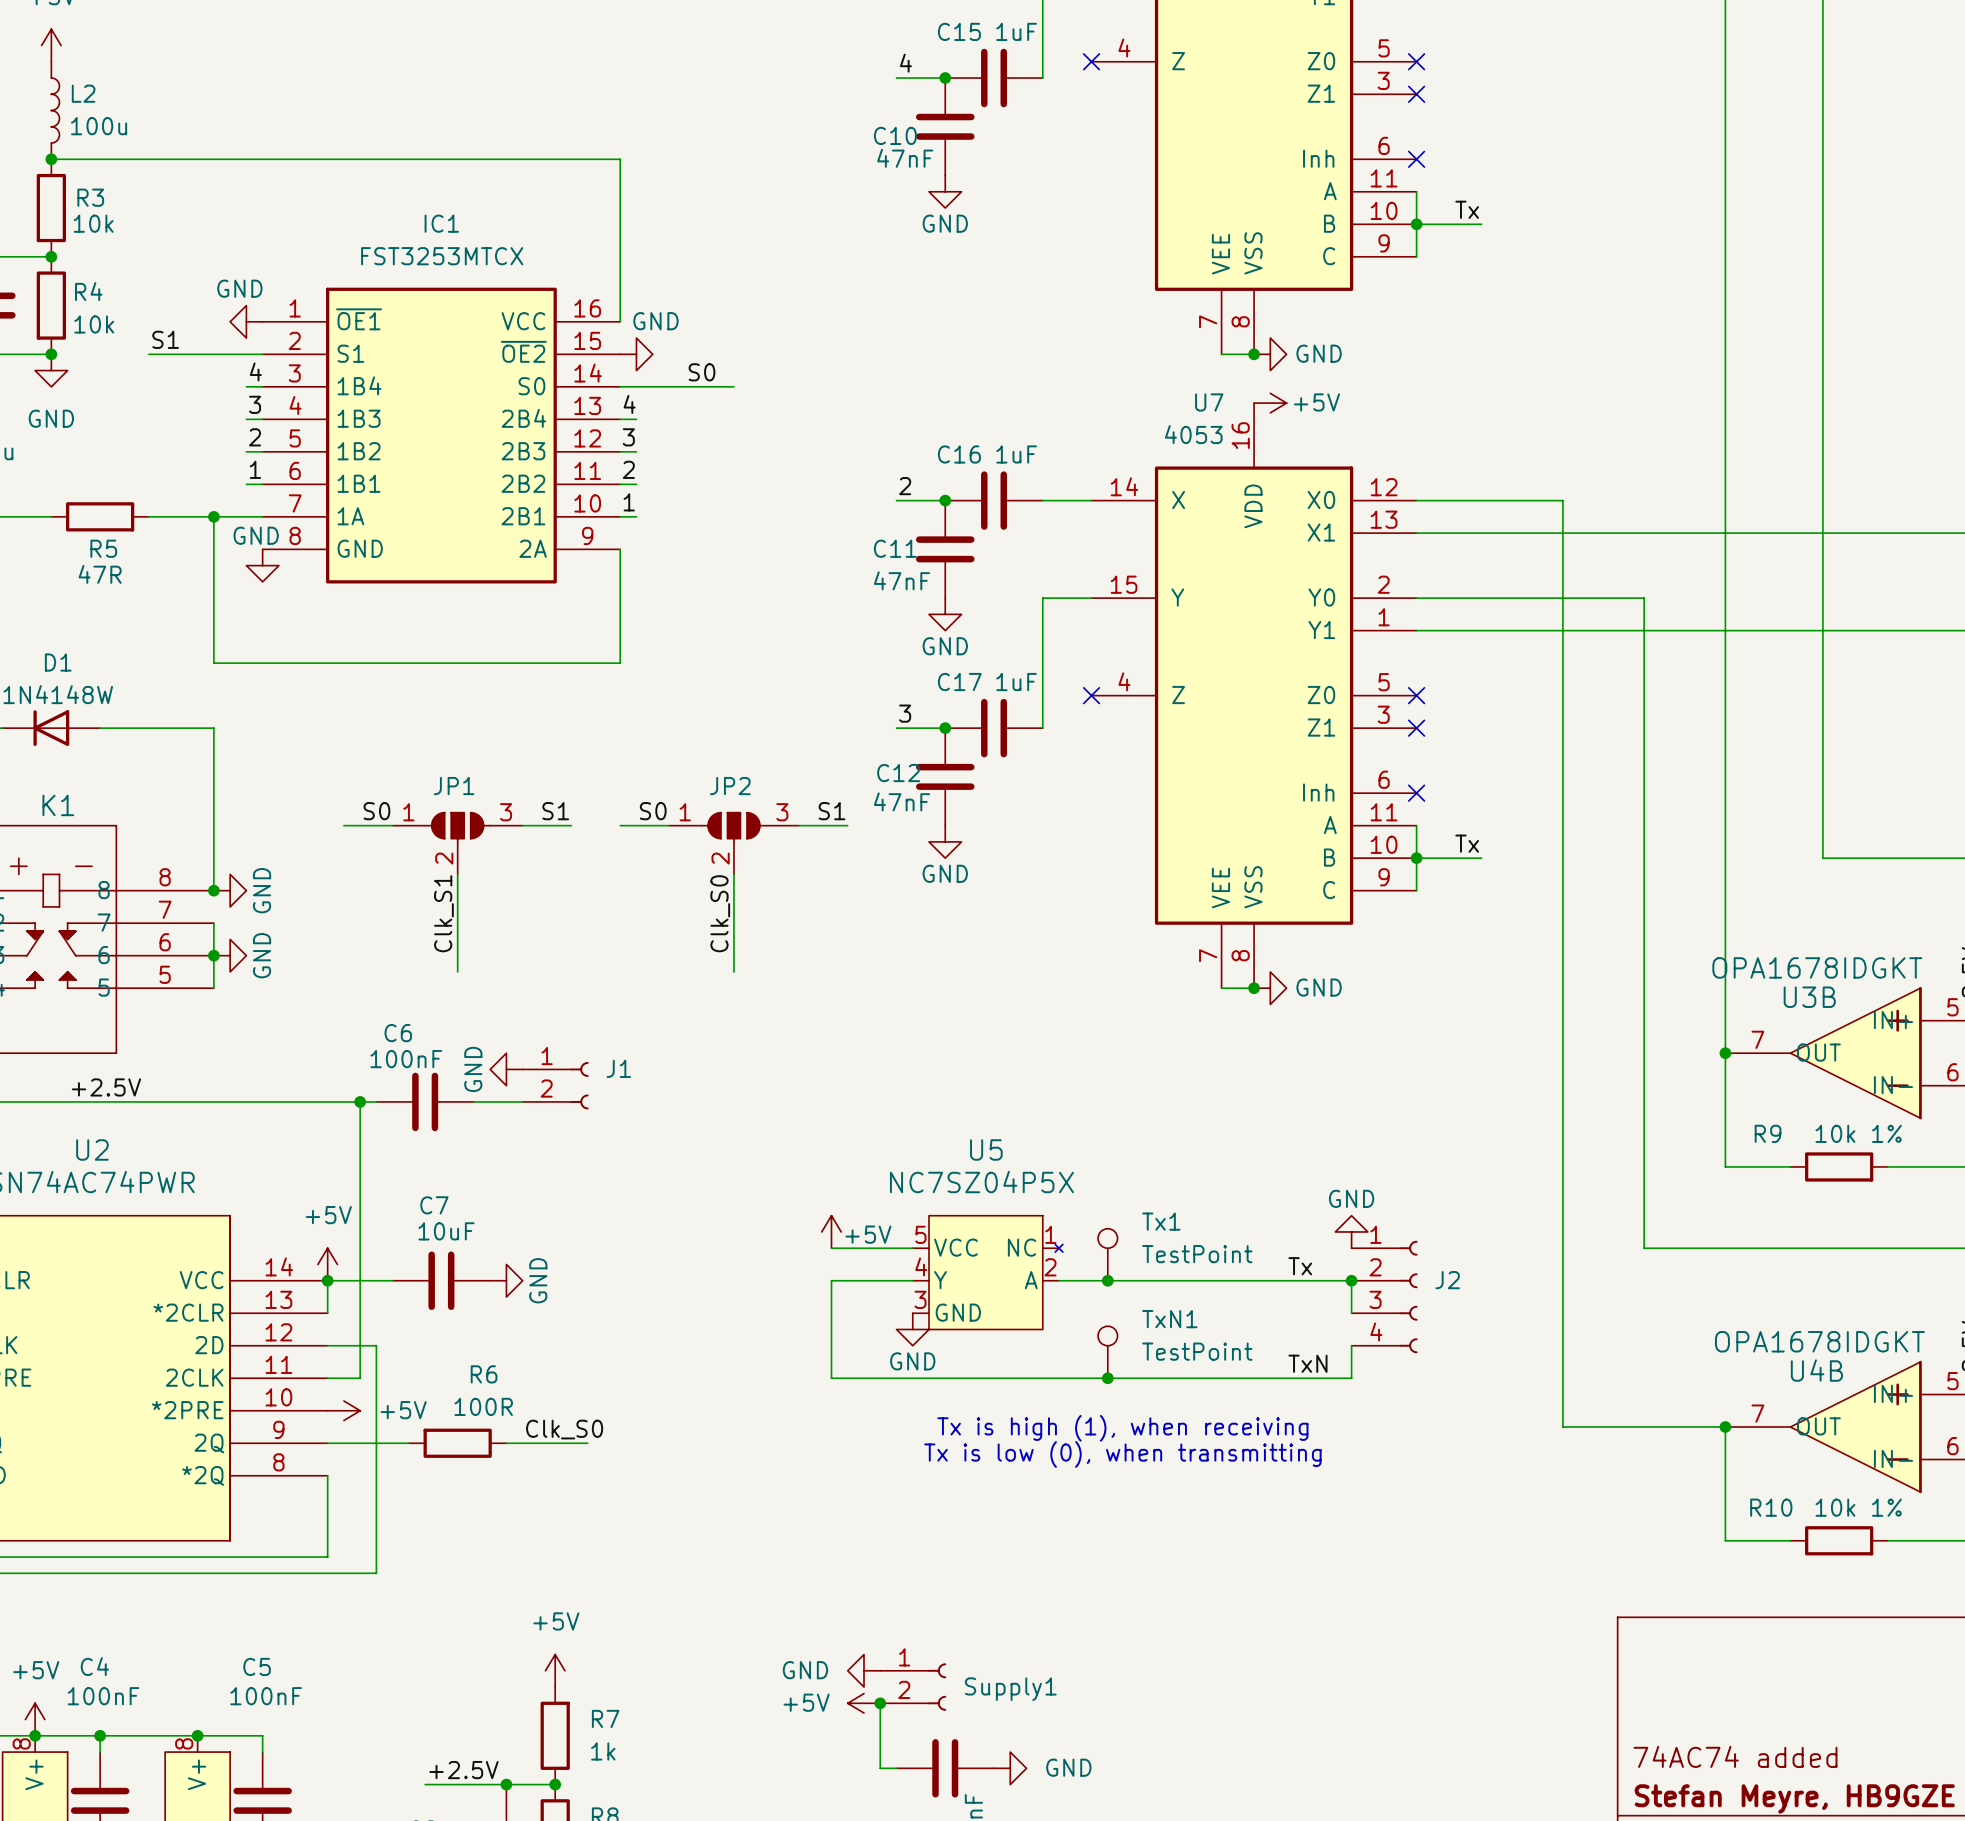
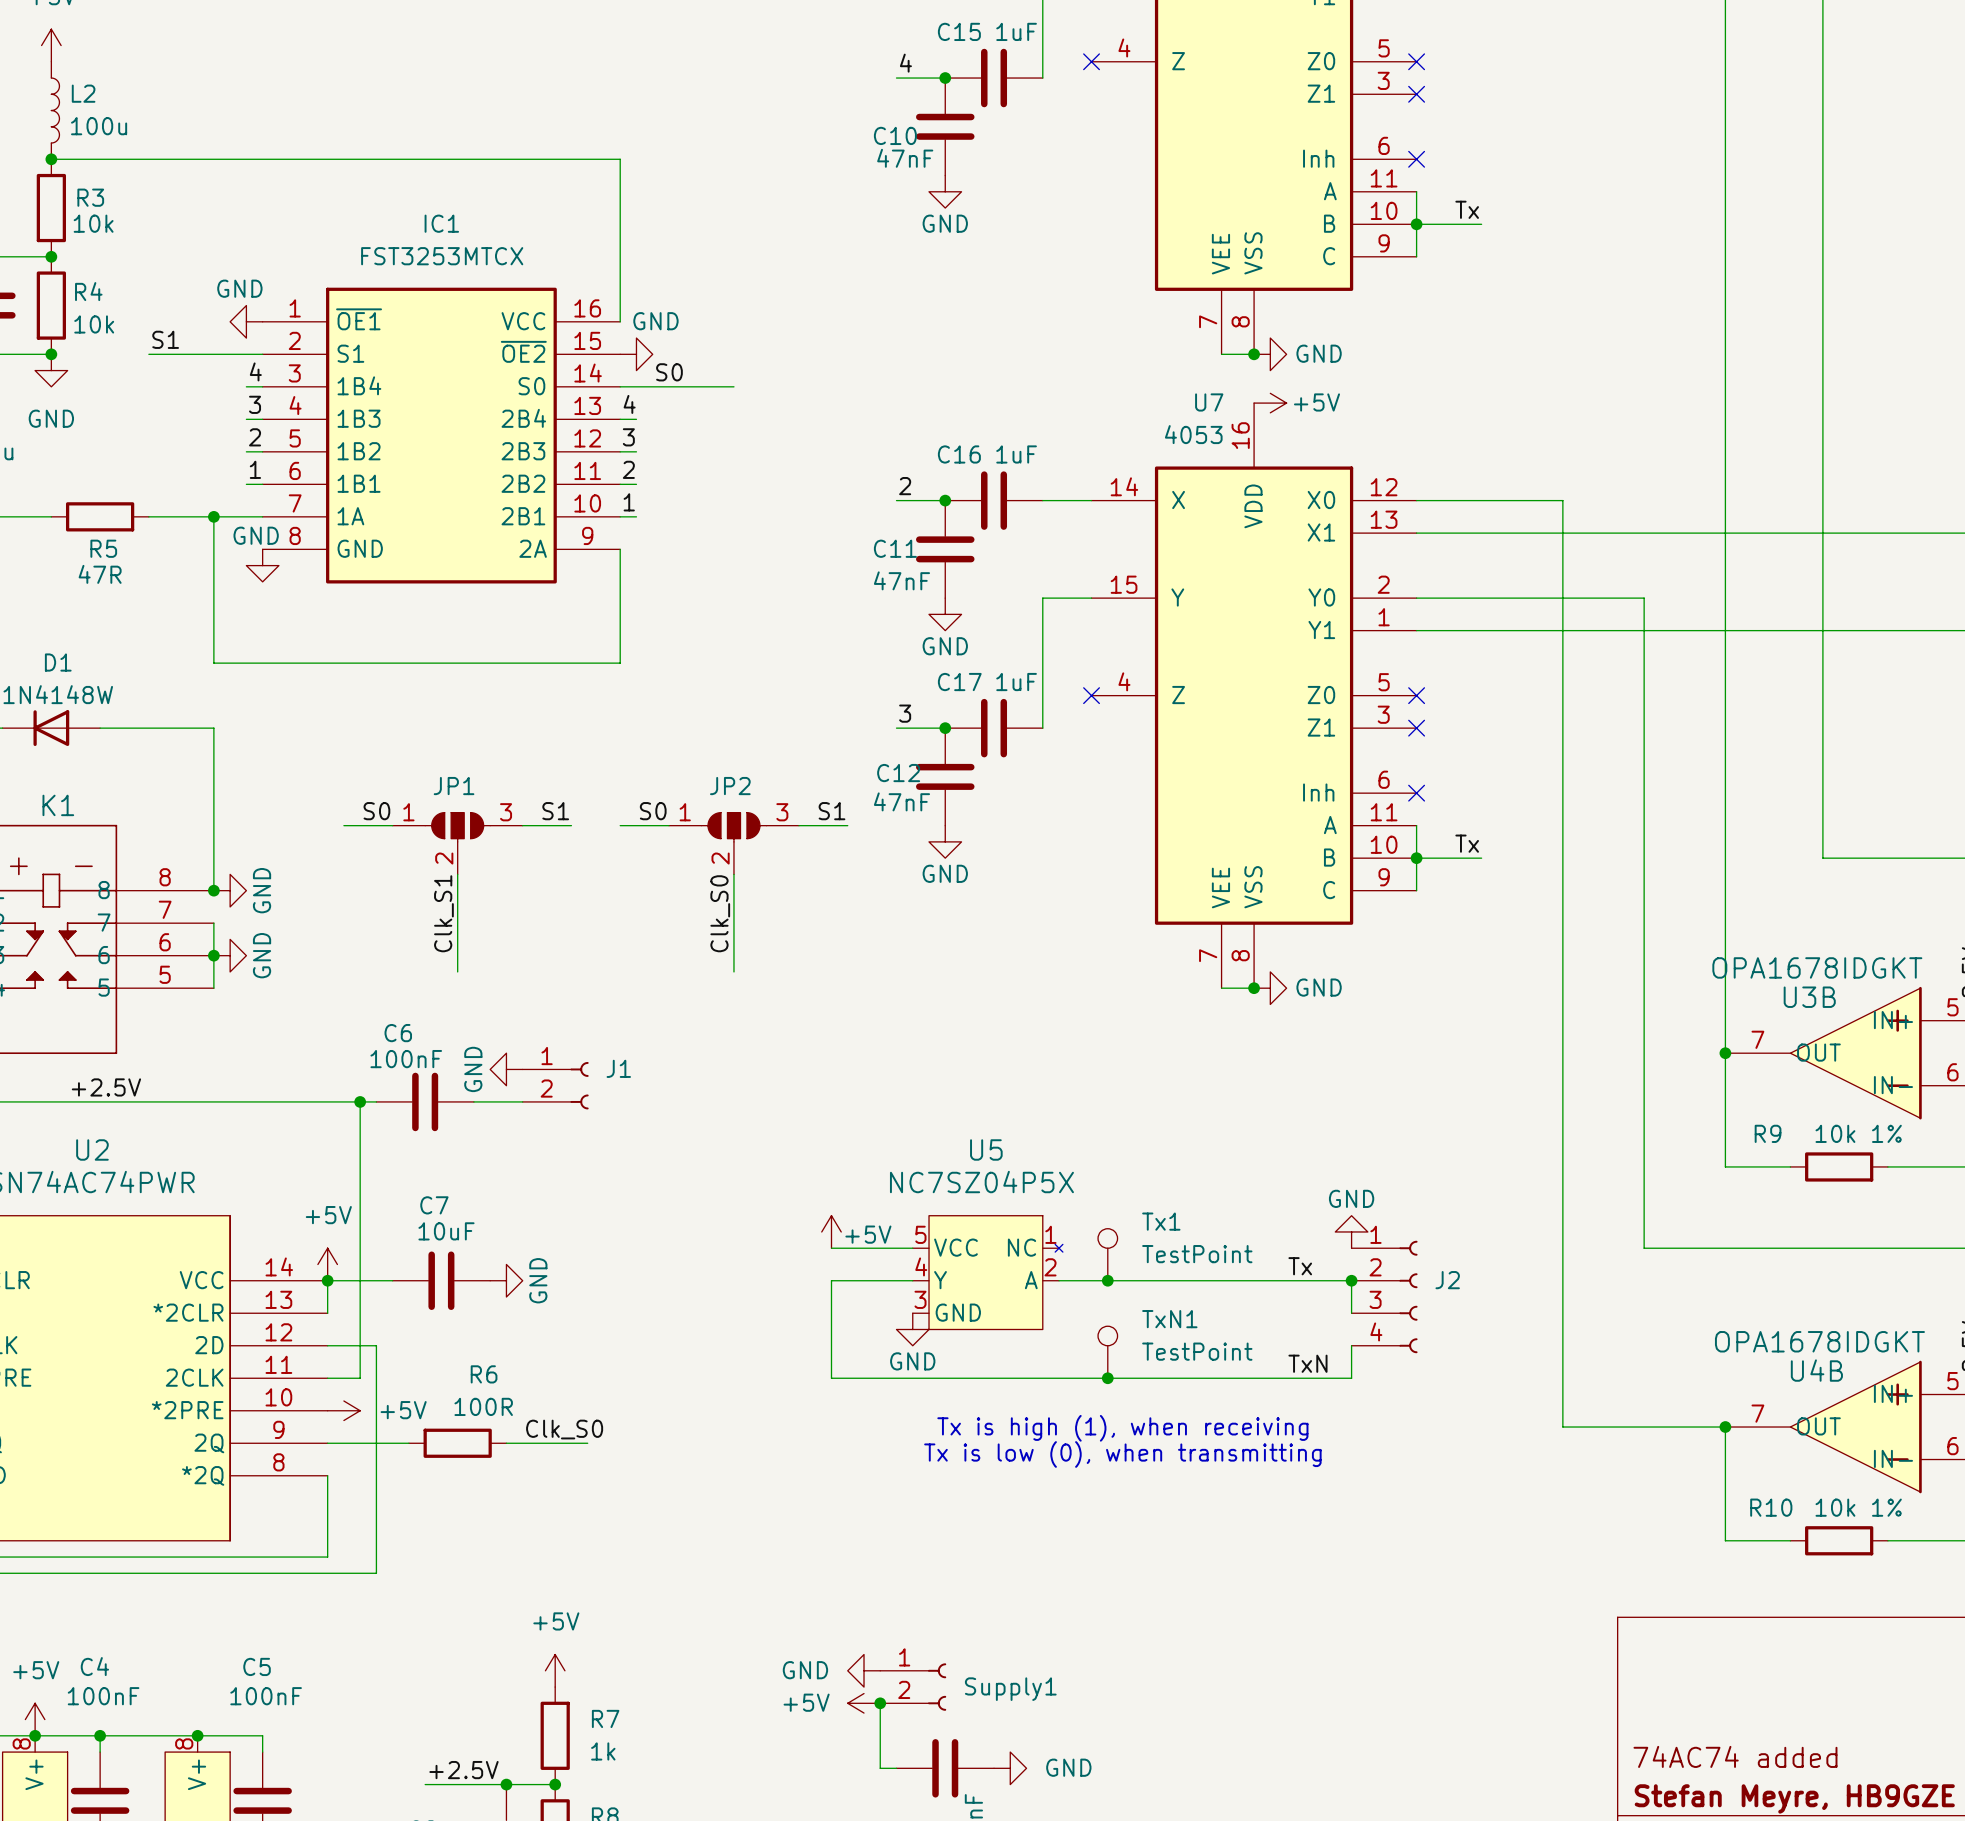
label position: S0 (701, 372) -> S0 (669, 372)

